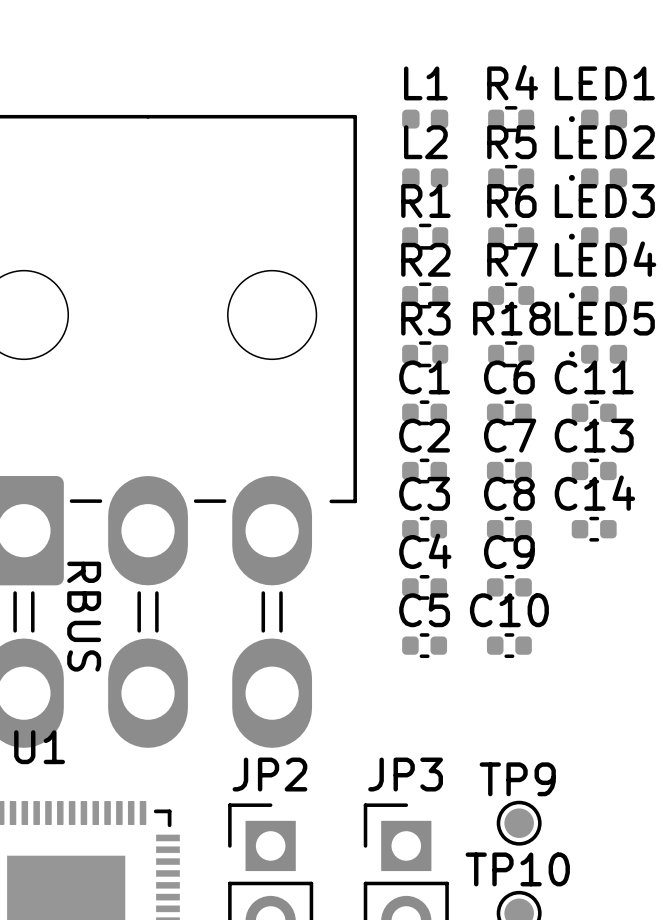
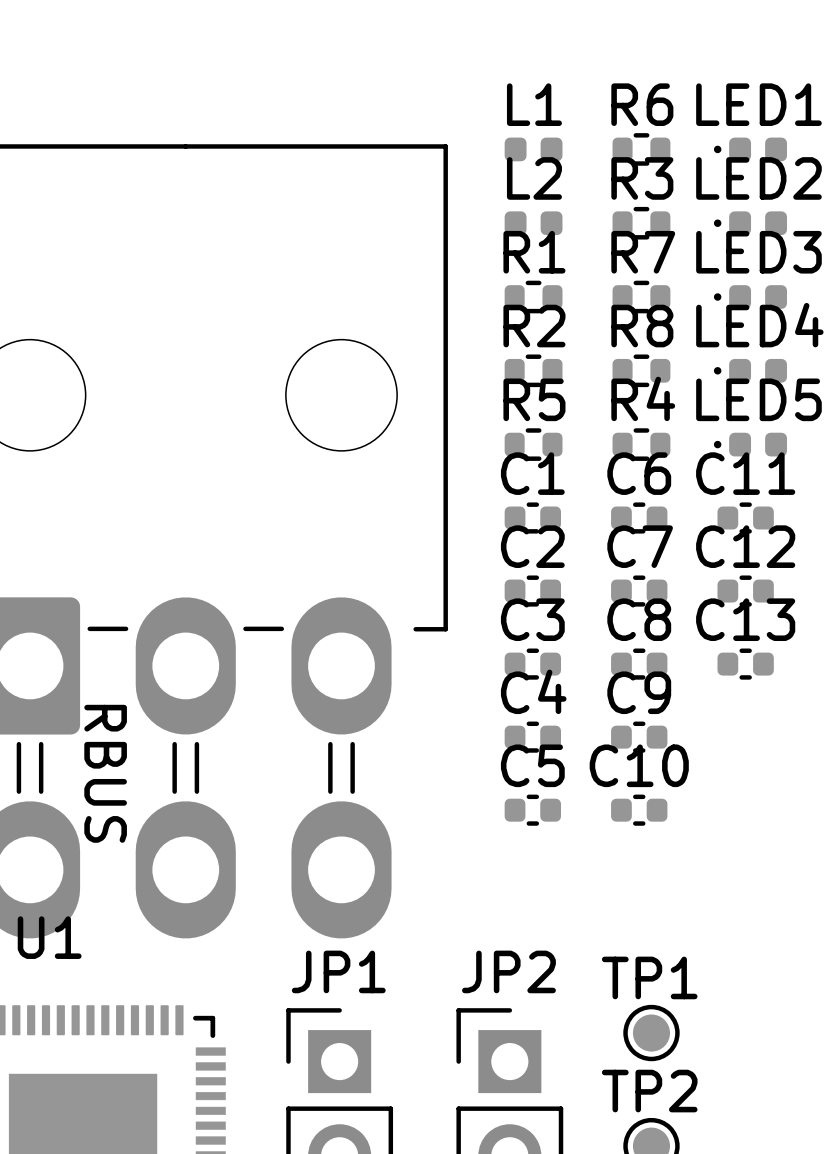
R4 name: R4 (512, 82) -> R6 (642, 104)
R5 name: R5 (511, 142) -> R3 (642, 178)
R6 name: R6 (511, 201) -> R7 (643, 252)
R7 name: R7 (512, 259) -> R8 (642, 326)
R3 name: R3 (425, 318) -> R5 (534, 399)
R18 name: R18 (511, 318) -> R4 (643, 398)
C13 name: C13 (594, 435) -> C12 (745, 546)
C14 name: C14 (594, 493) -> C13 (745, 619)
JP2 name: JP2 (269, 774) -> JP1 (338, 971)
JP3 name: JP3 (405, 774) -> JP2 (508, 971)
TP9 name: TP9 (517, 779) -> TP1 (649, 977)
TP10 name: TP10 (517, 869) -> TP2 (649, 1091)

